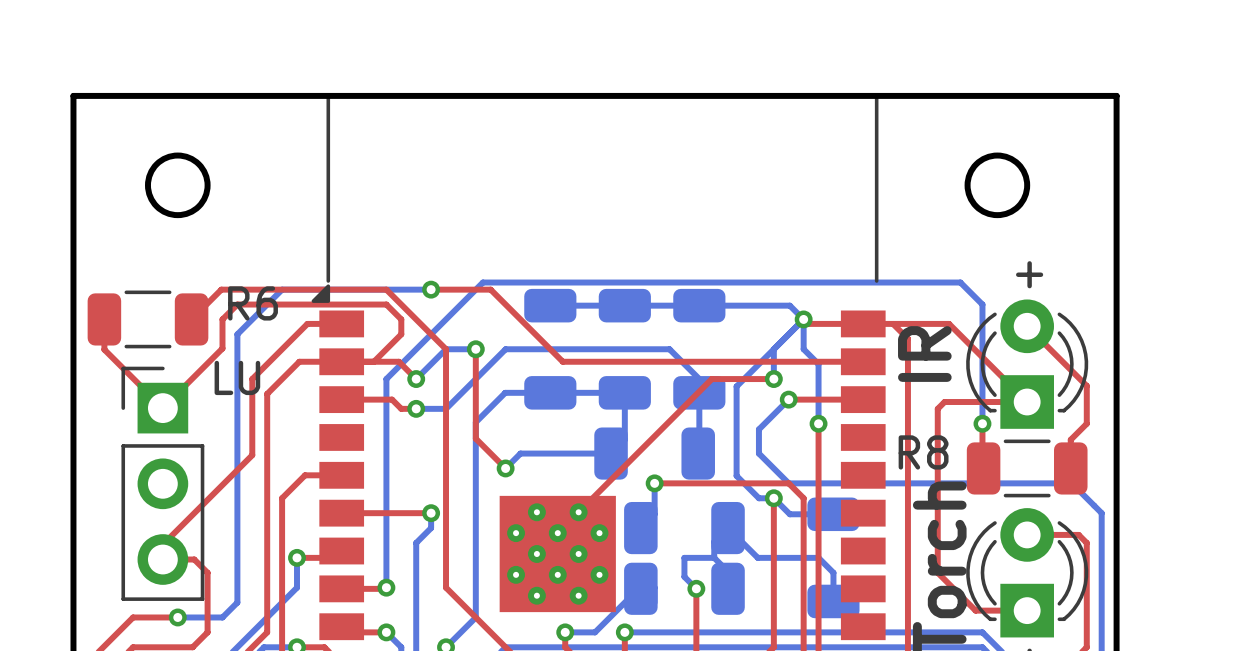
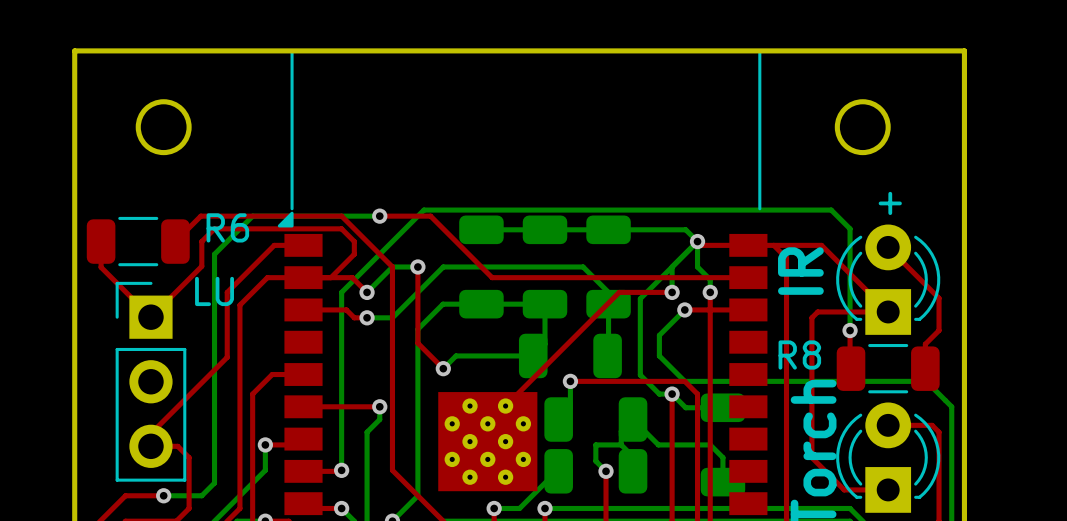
top track: none -> (710, 292) (710, 330)
bottom track: (818, 379) (818, 423) -> none
via position: (818, 423) -> (710, 292)

